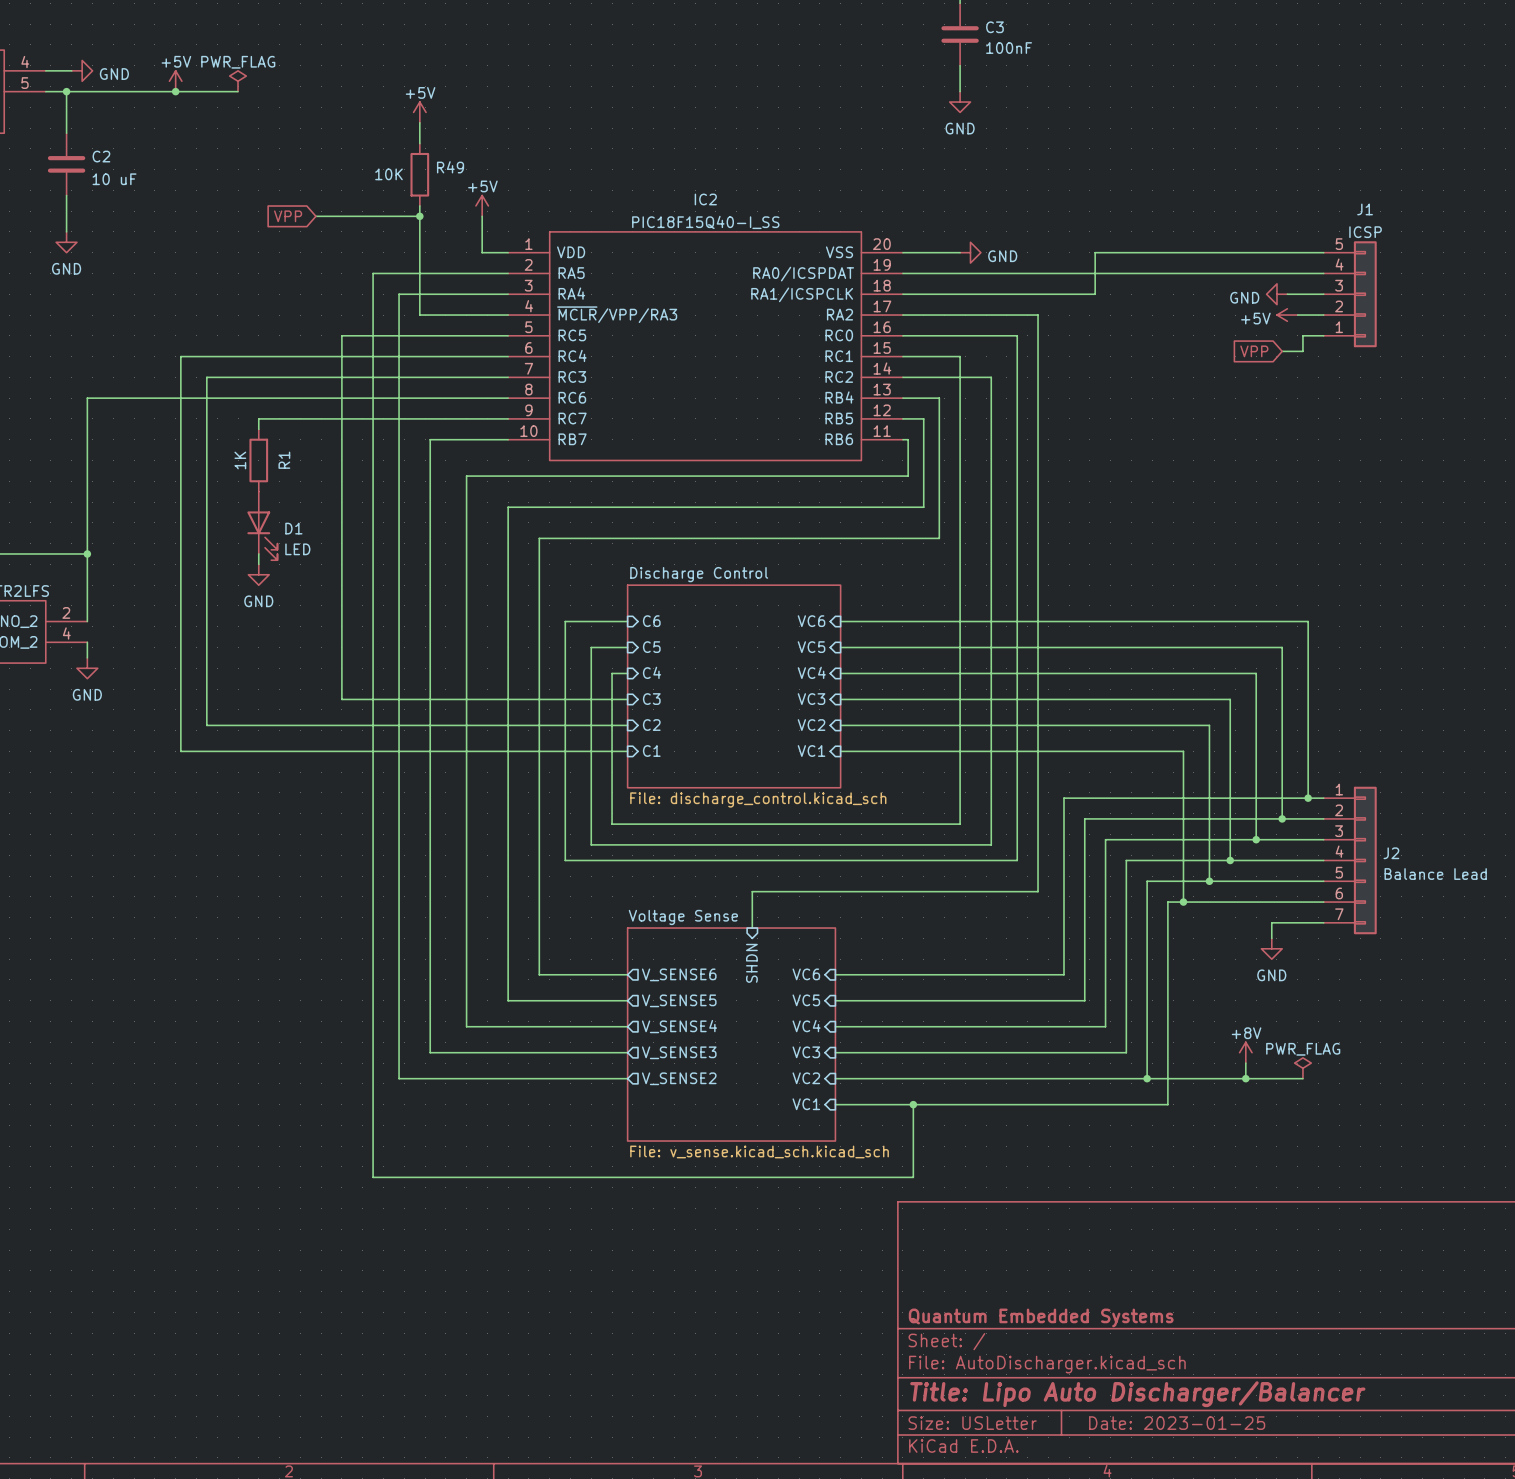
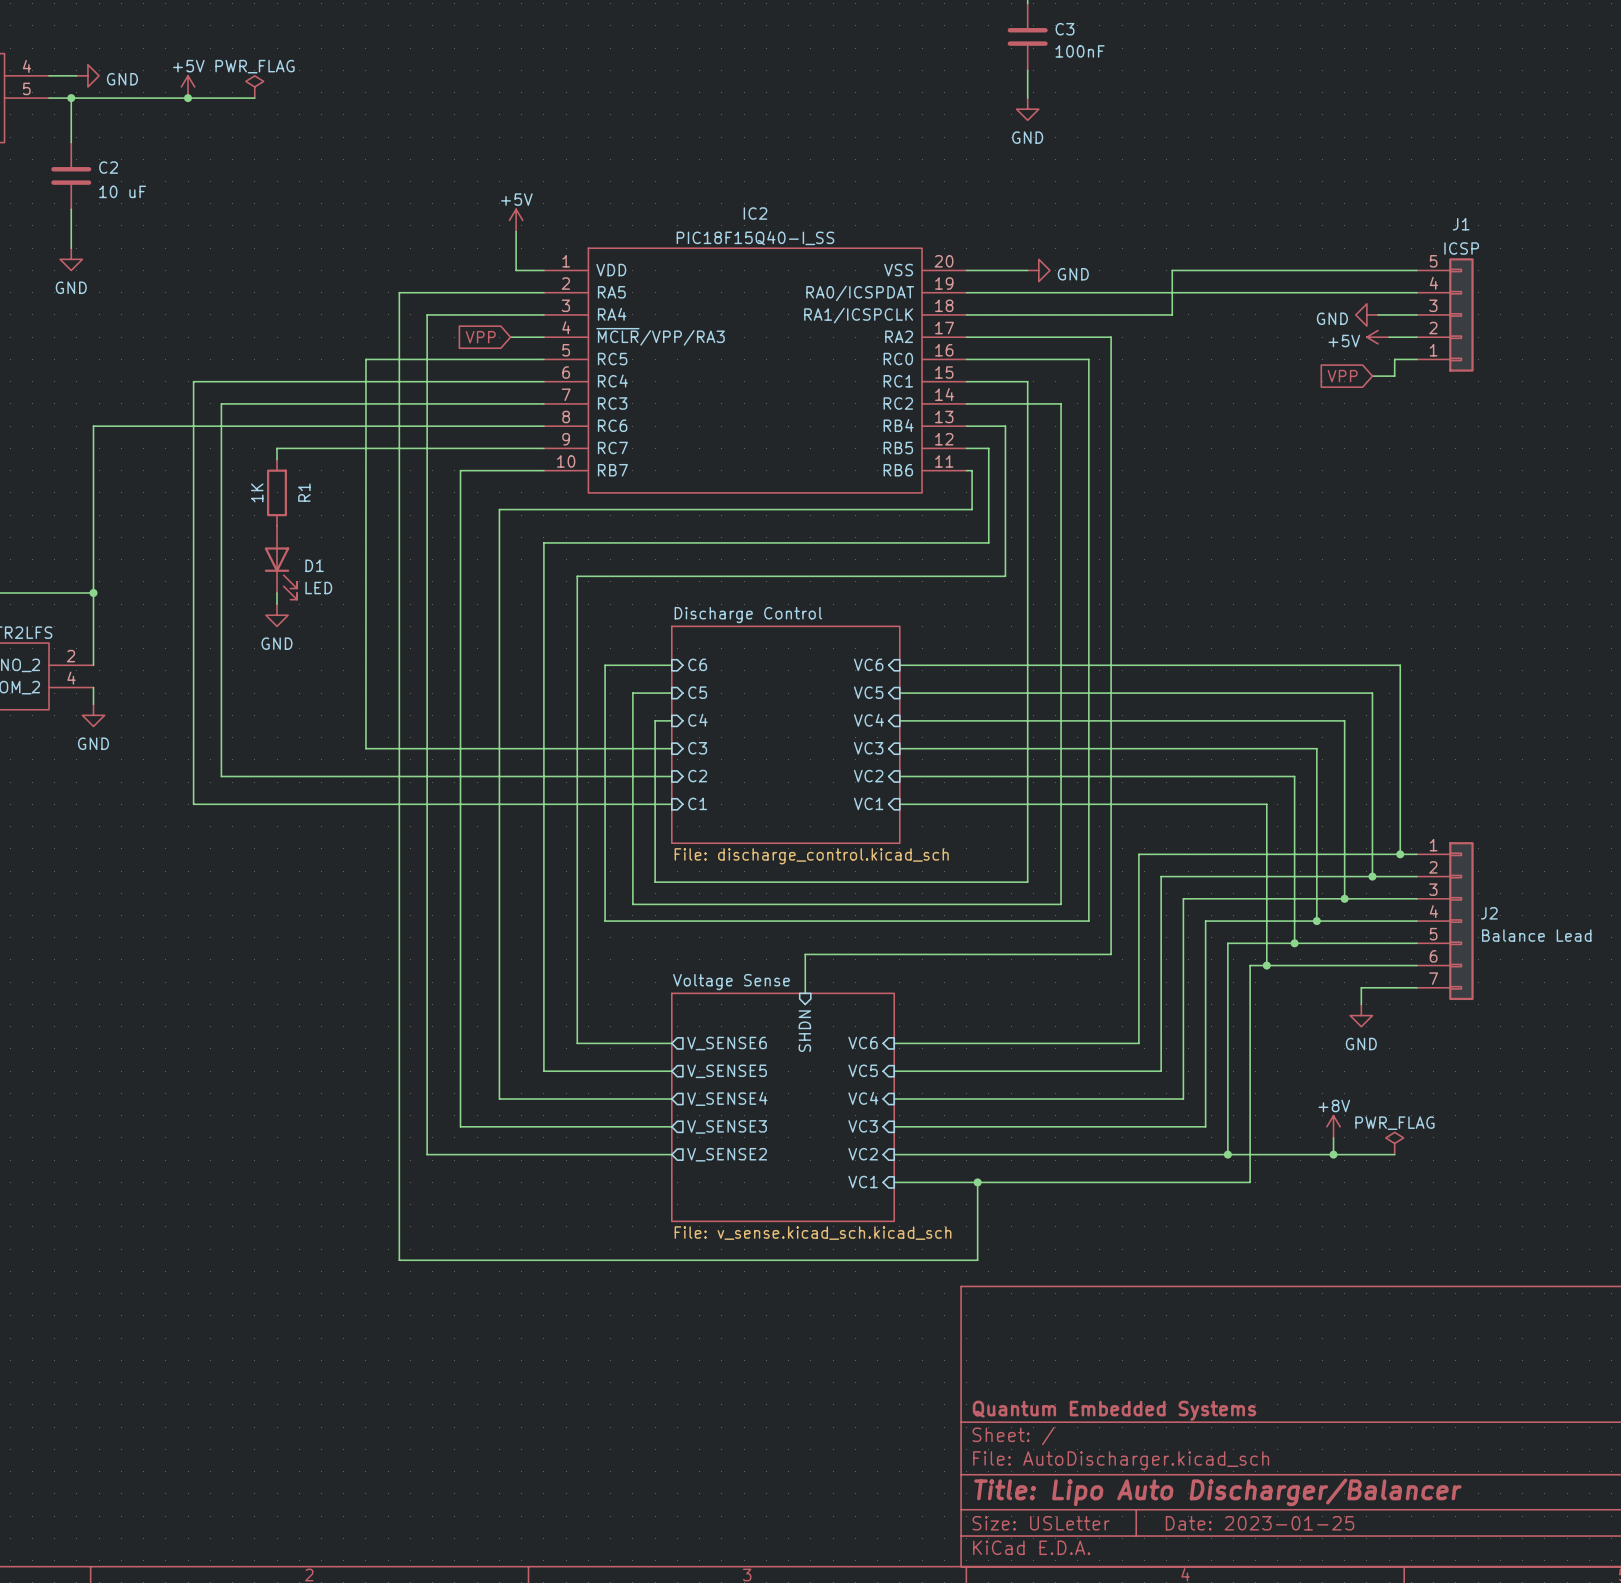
power symbol: +5V (419, 112) -> none
wire: (419, 122) (419, 143) -> none
R49: 10K (419, 174) -> none
wire: (419, 205) (419, 315) (476, 315) -> none
global label position: VPP (288, 216) -> VPP (480, 337)
wire: (315, 216) (419, 216) -> none
junction: (419, 216) -> none

